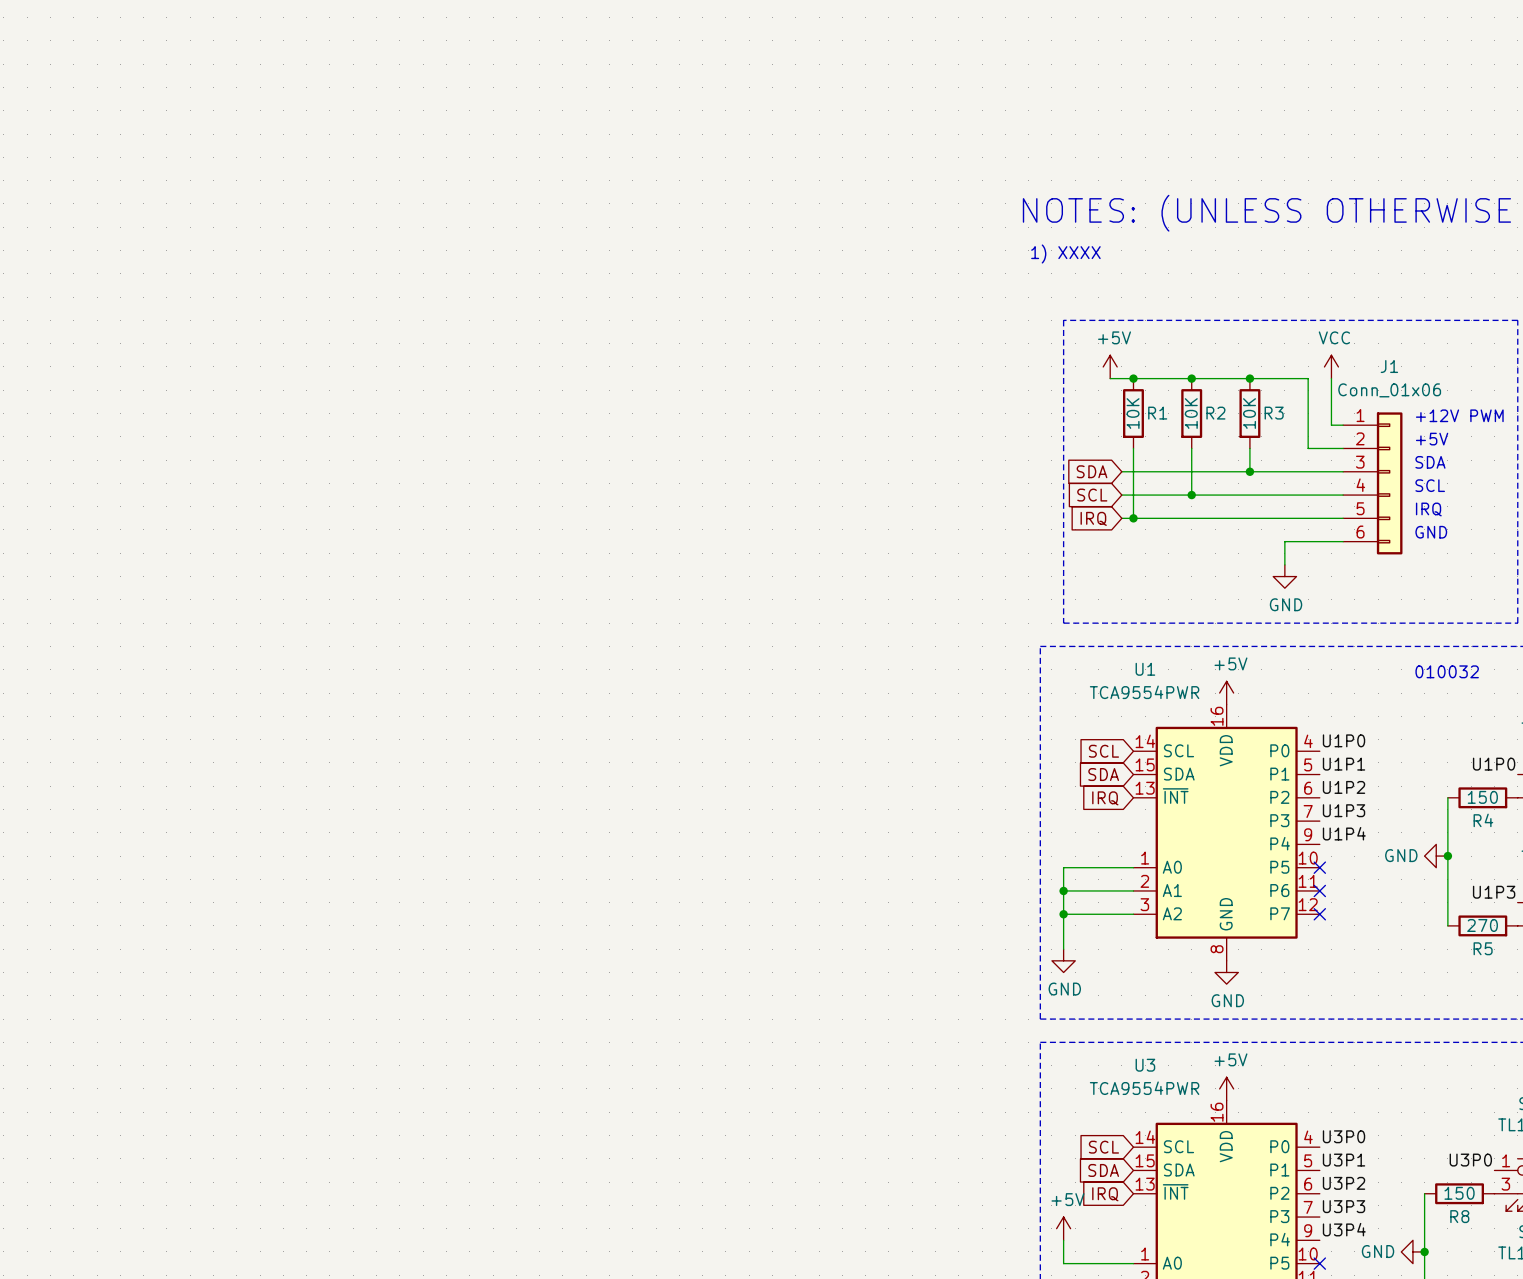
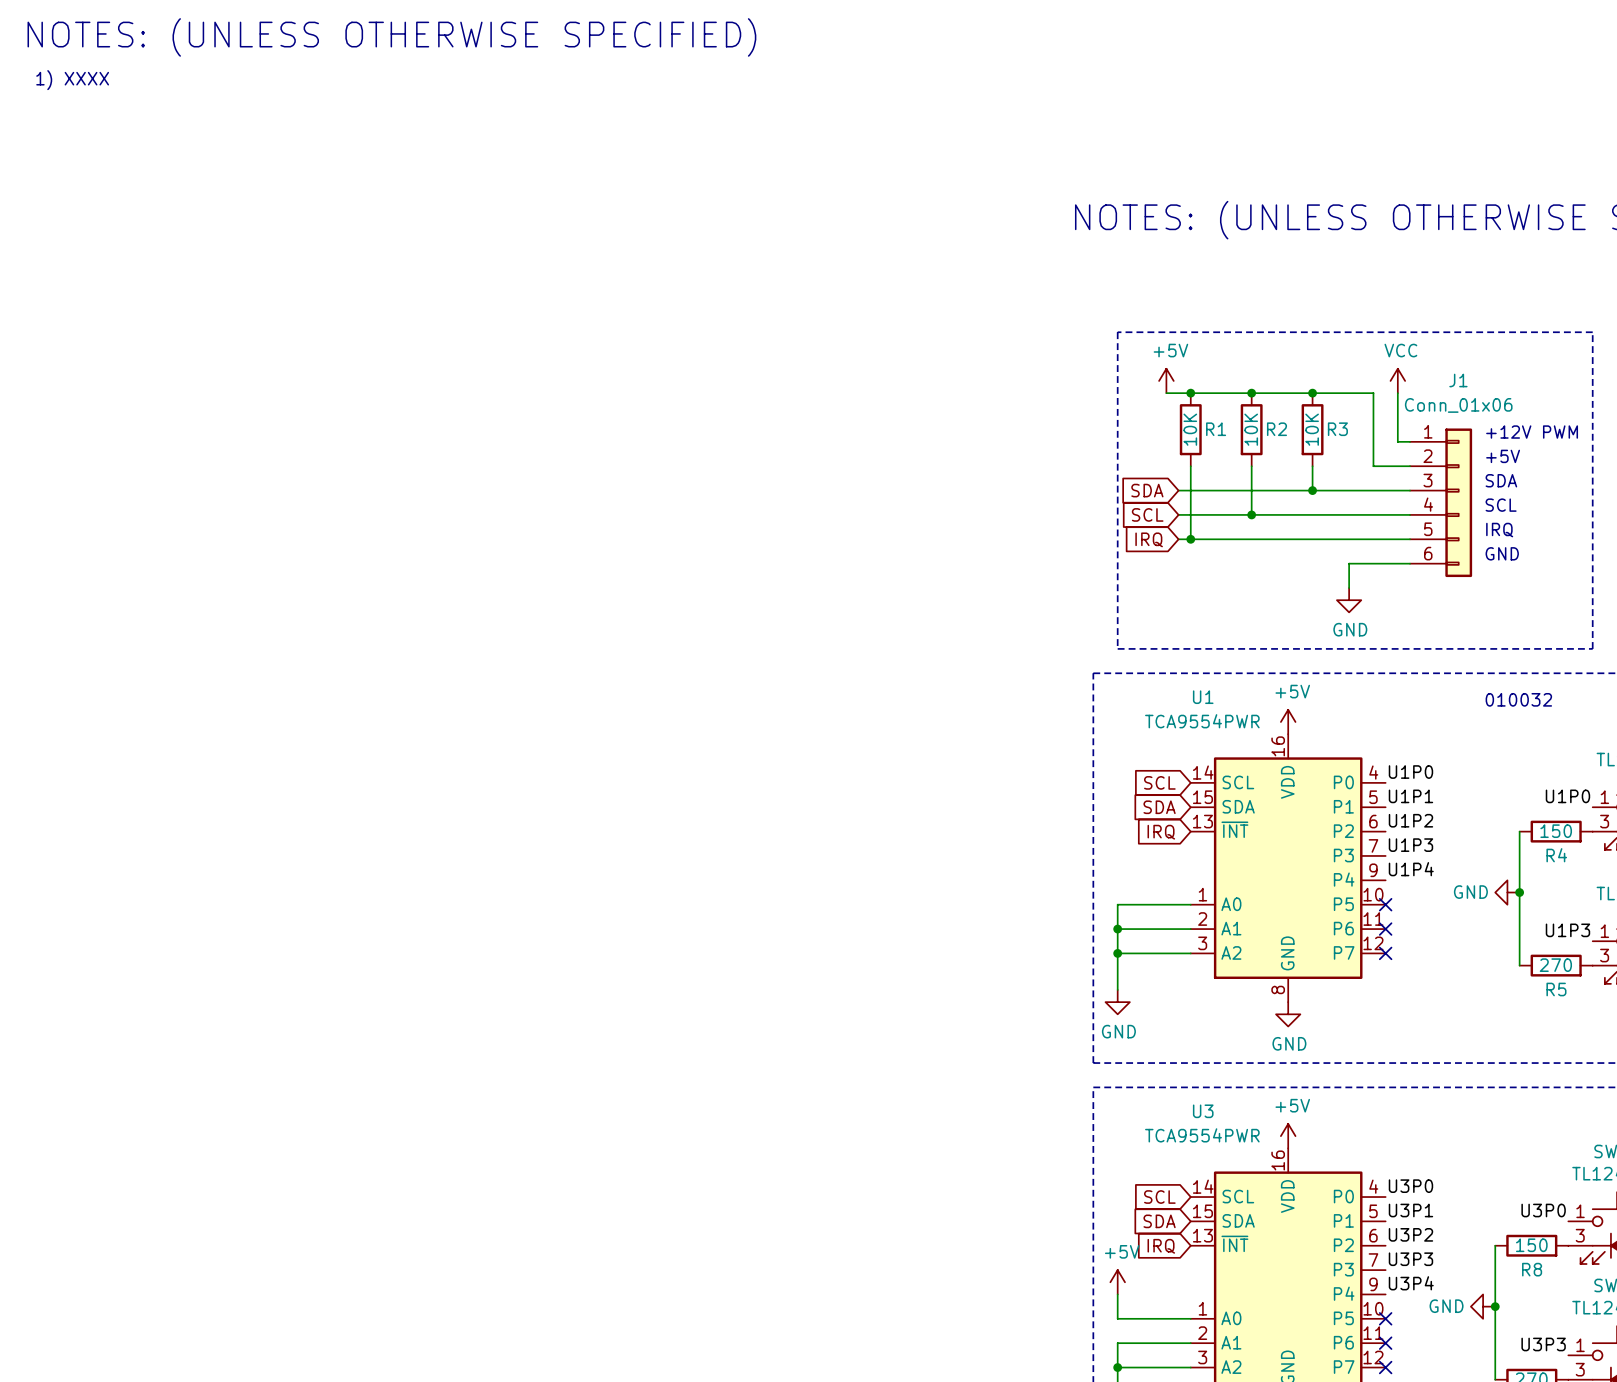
text: none -> NOTES: (UNLESS OTHERWISE SPECIFIED) (391, 37)
text: none -> 1) XXXX (72, 80)
text: 1) XXXX (1065, 254) -> none

